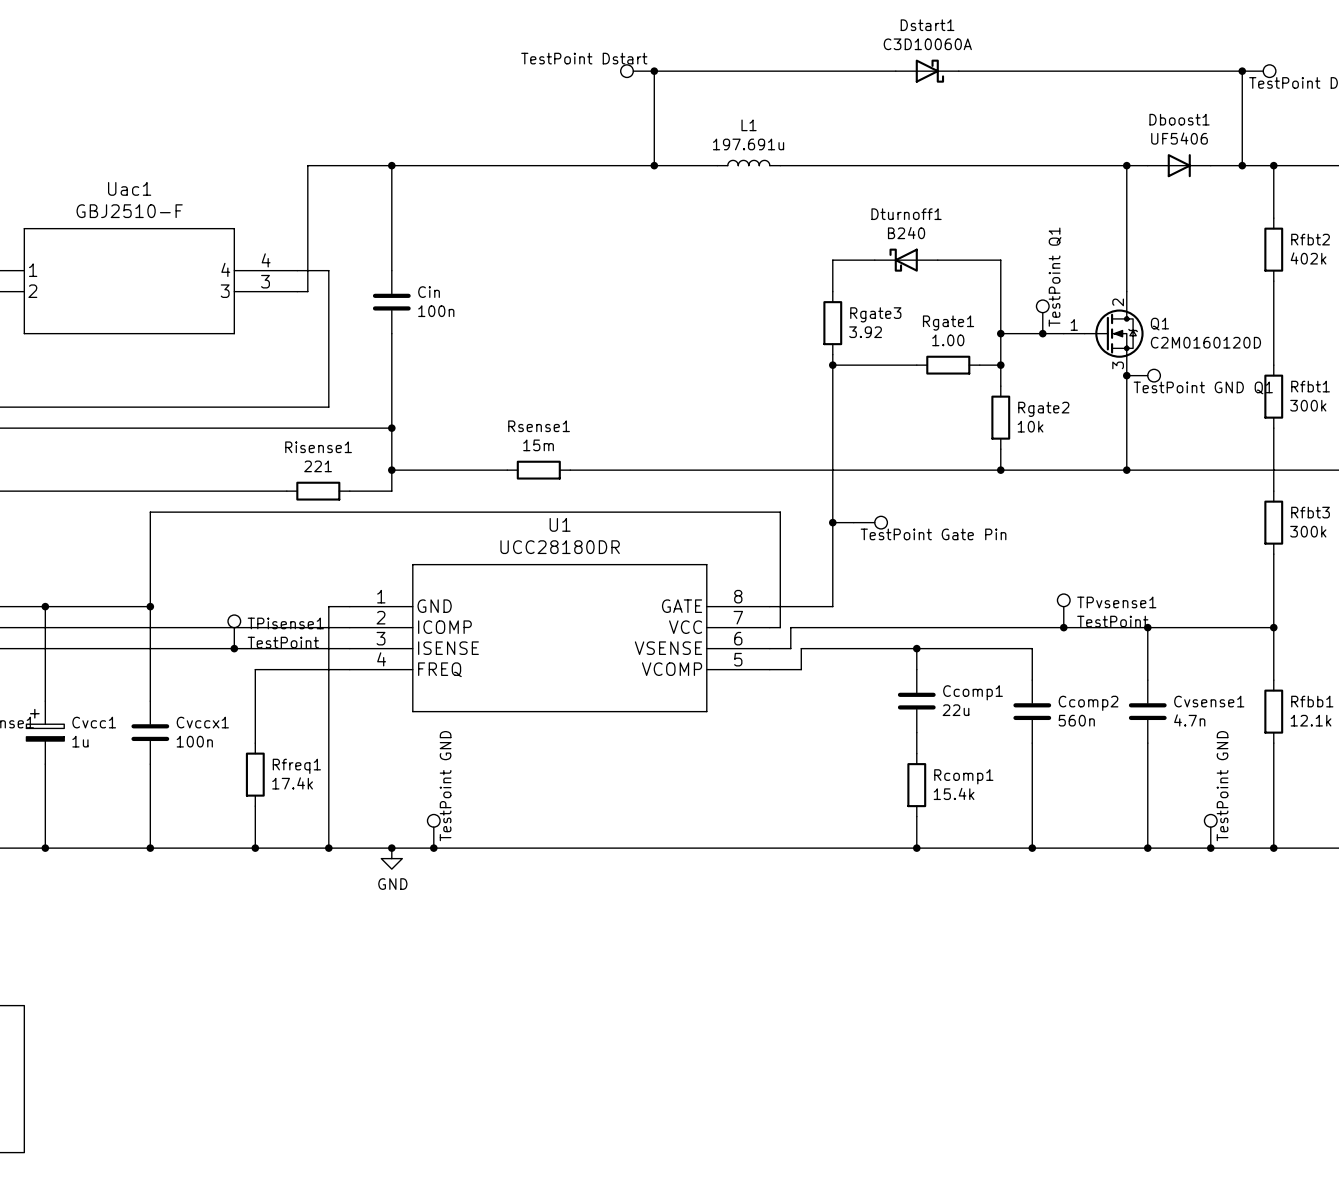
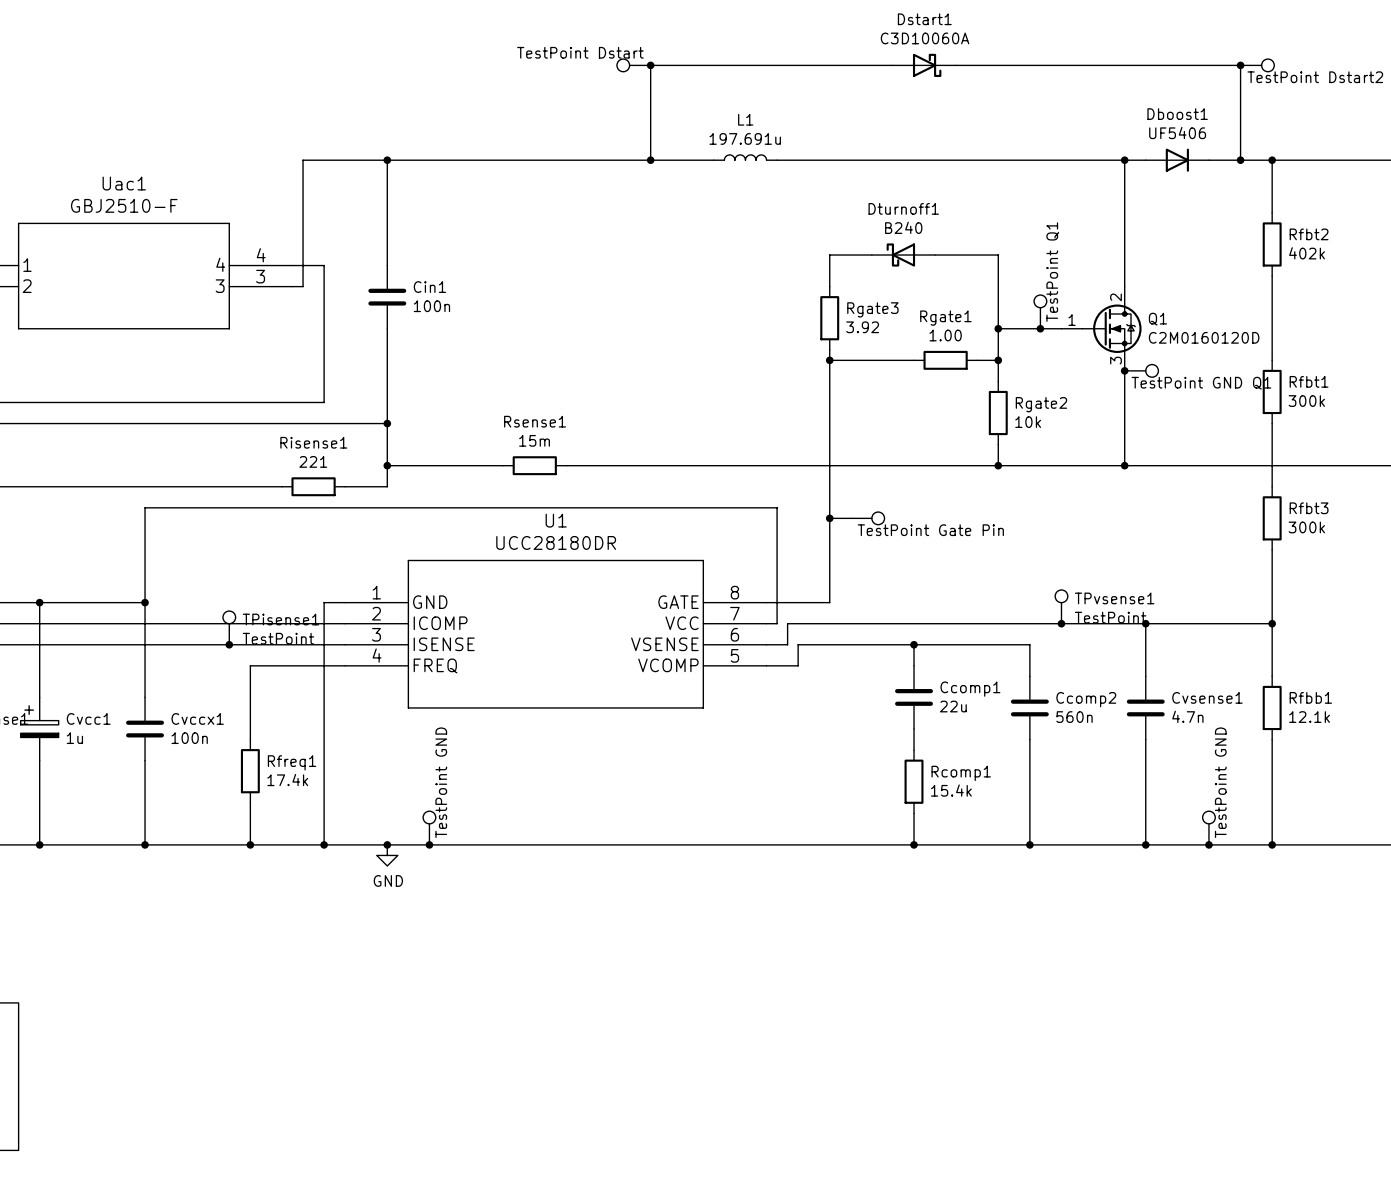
Cin name: Cin (429, 292) -> Cin1 (429, 287)

